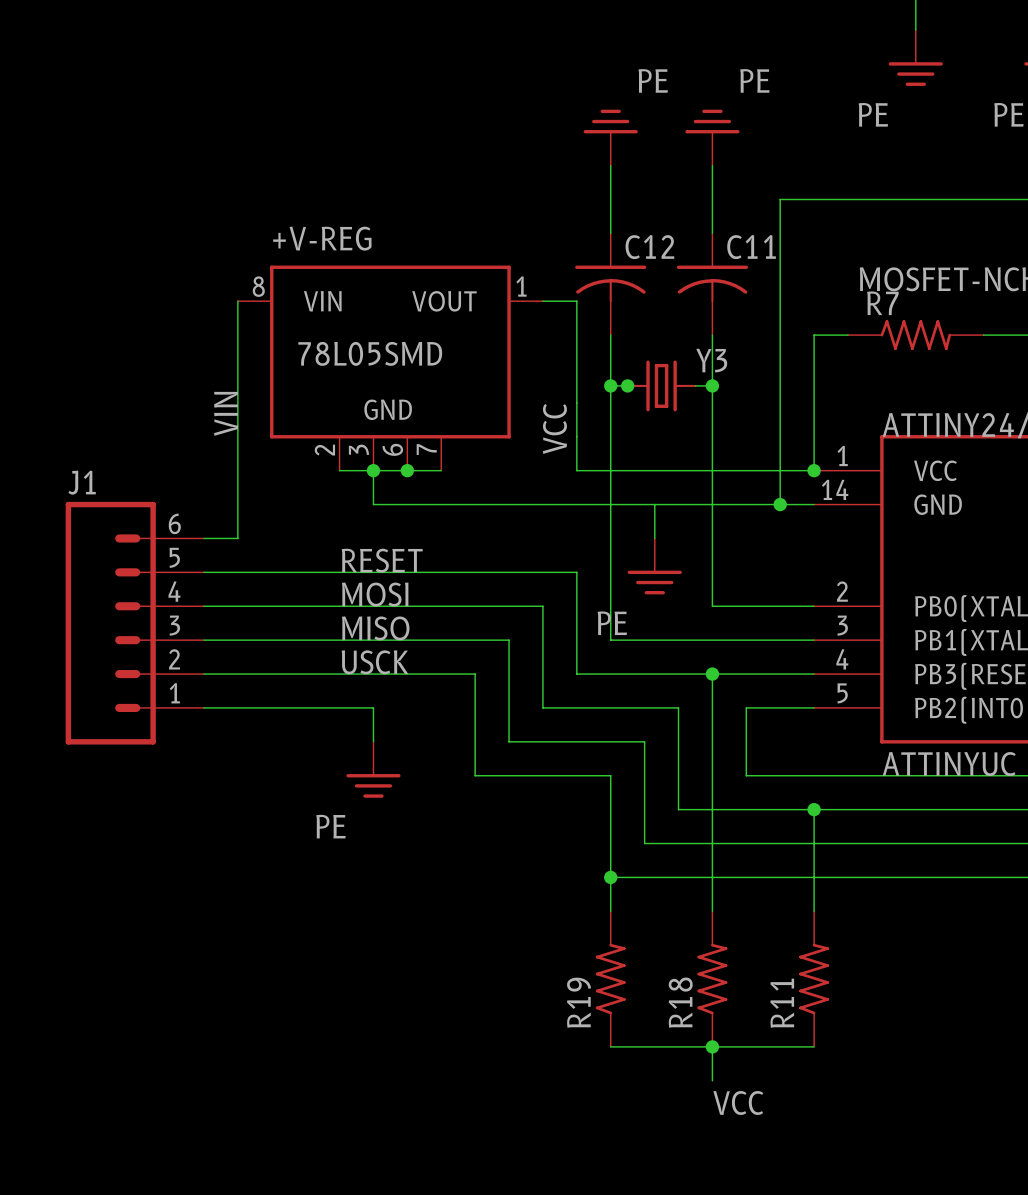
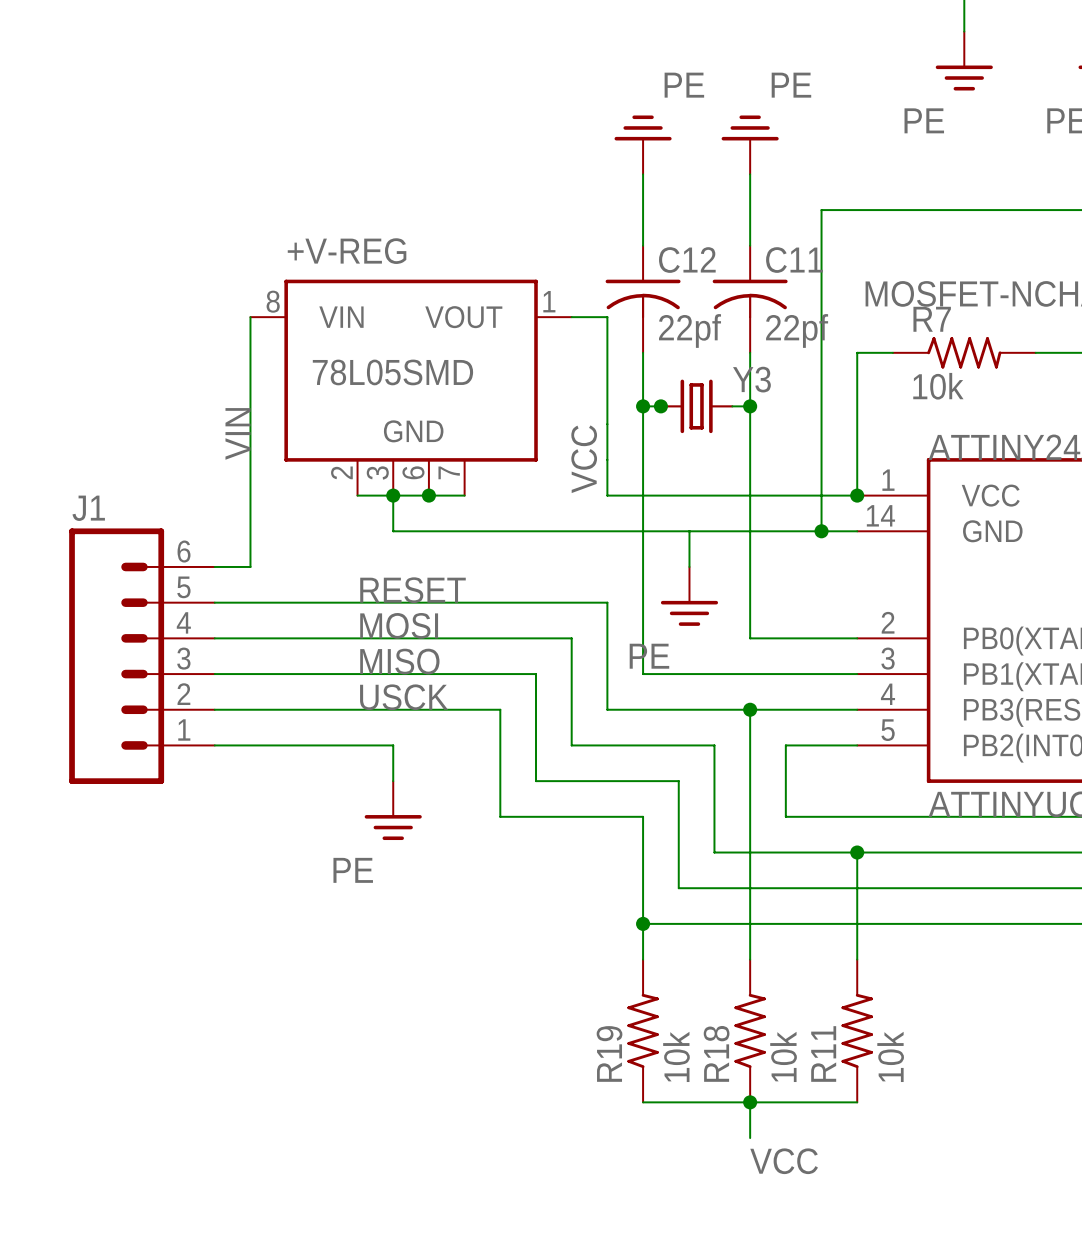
C12 value: none -> 22pf (690, 330)
C11 value: none -> 22pf (797, 330)
R7 value: none -> 10k (938, 386)
R19 value: none -> 10k (676, 1056)
R18 value: none -> 10k (783, 1056)
R11 value: none -> 10k (890, 1056)

